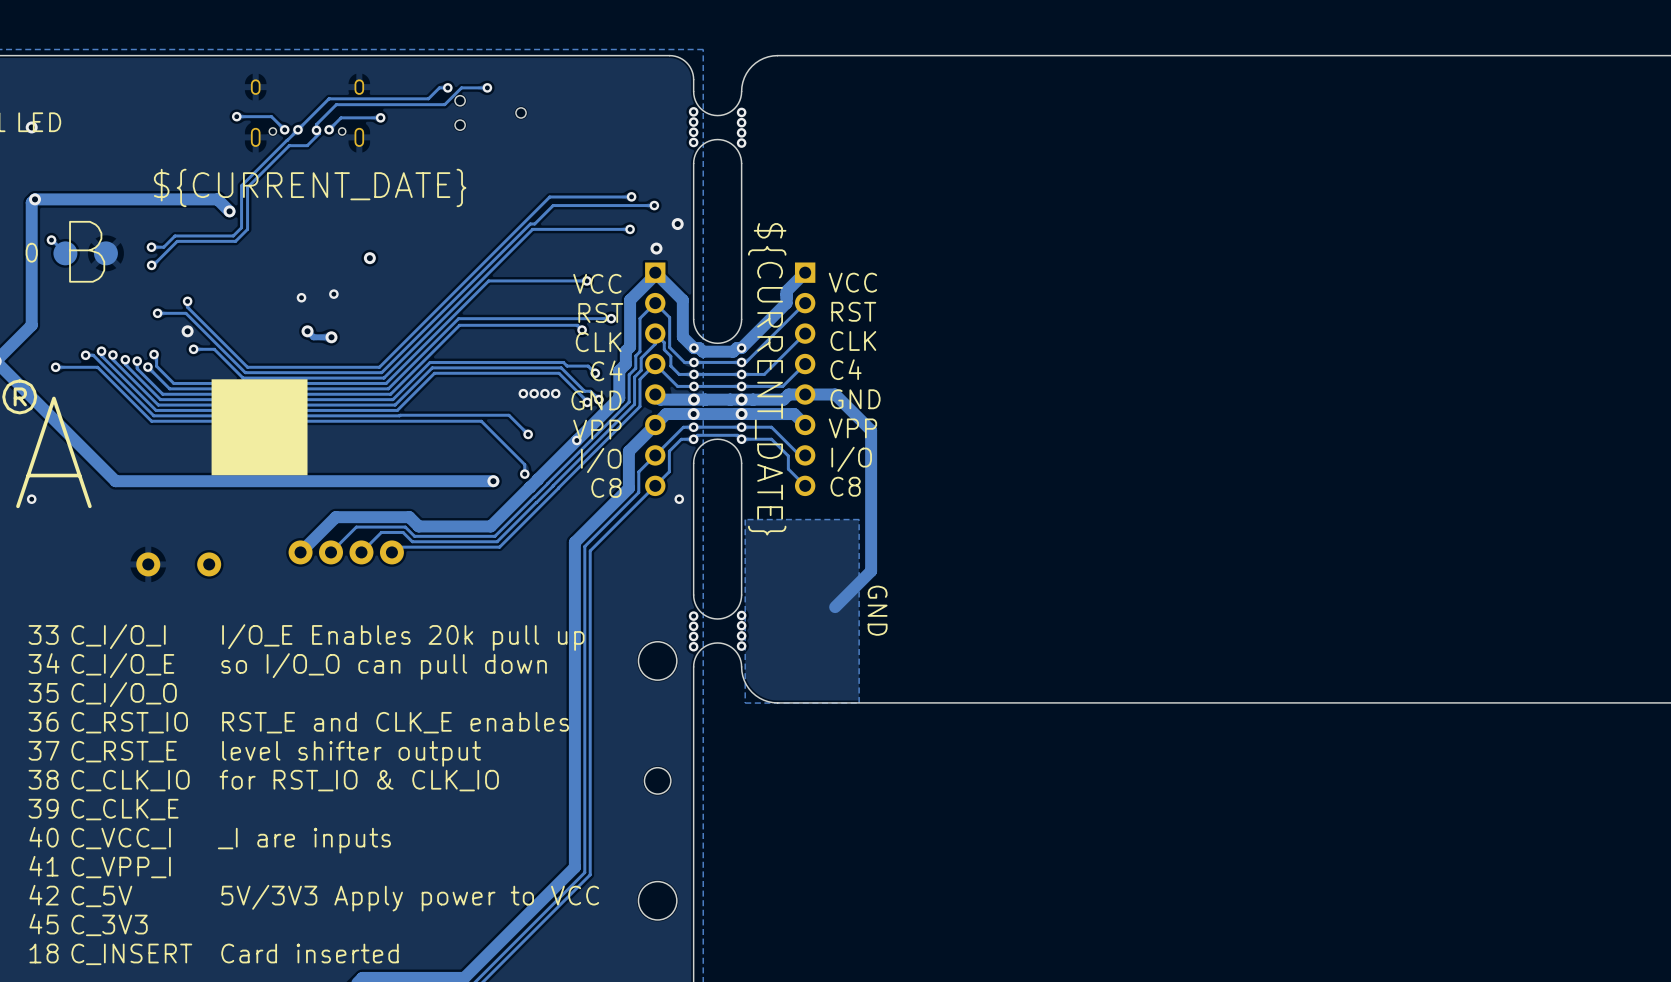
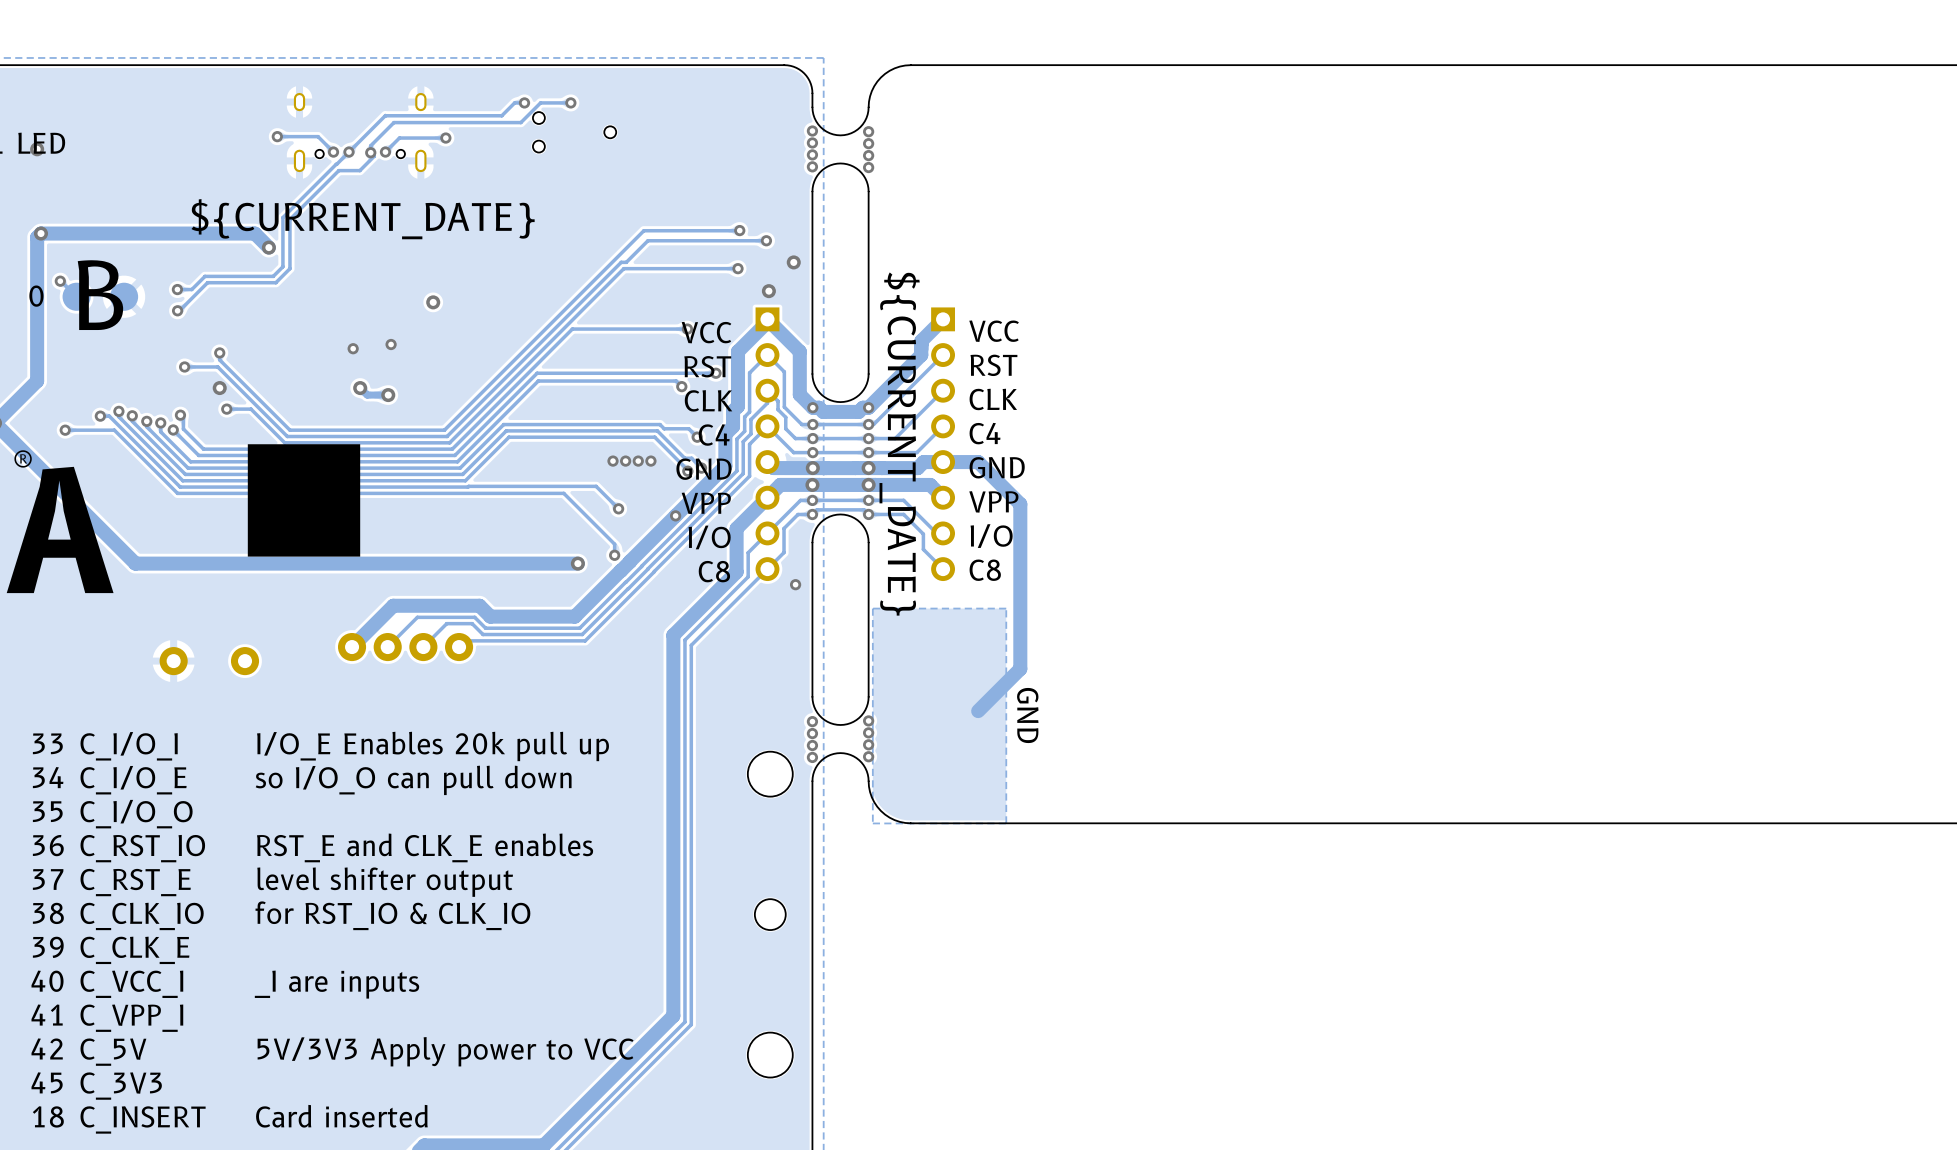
via: (31, 499) -> none

